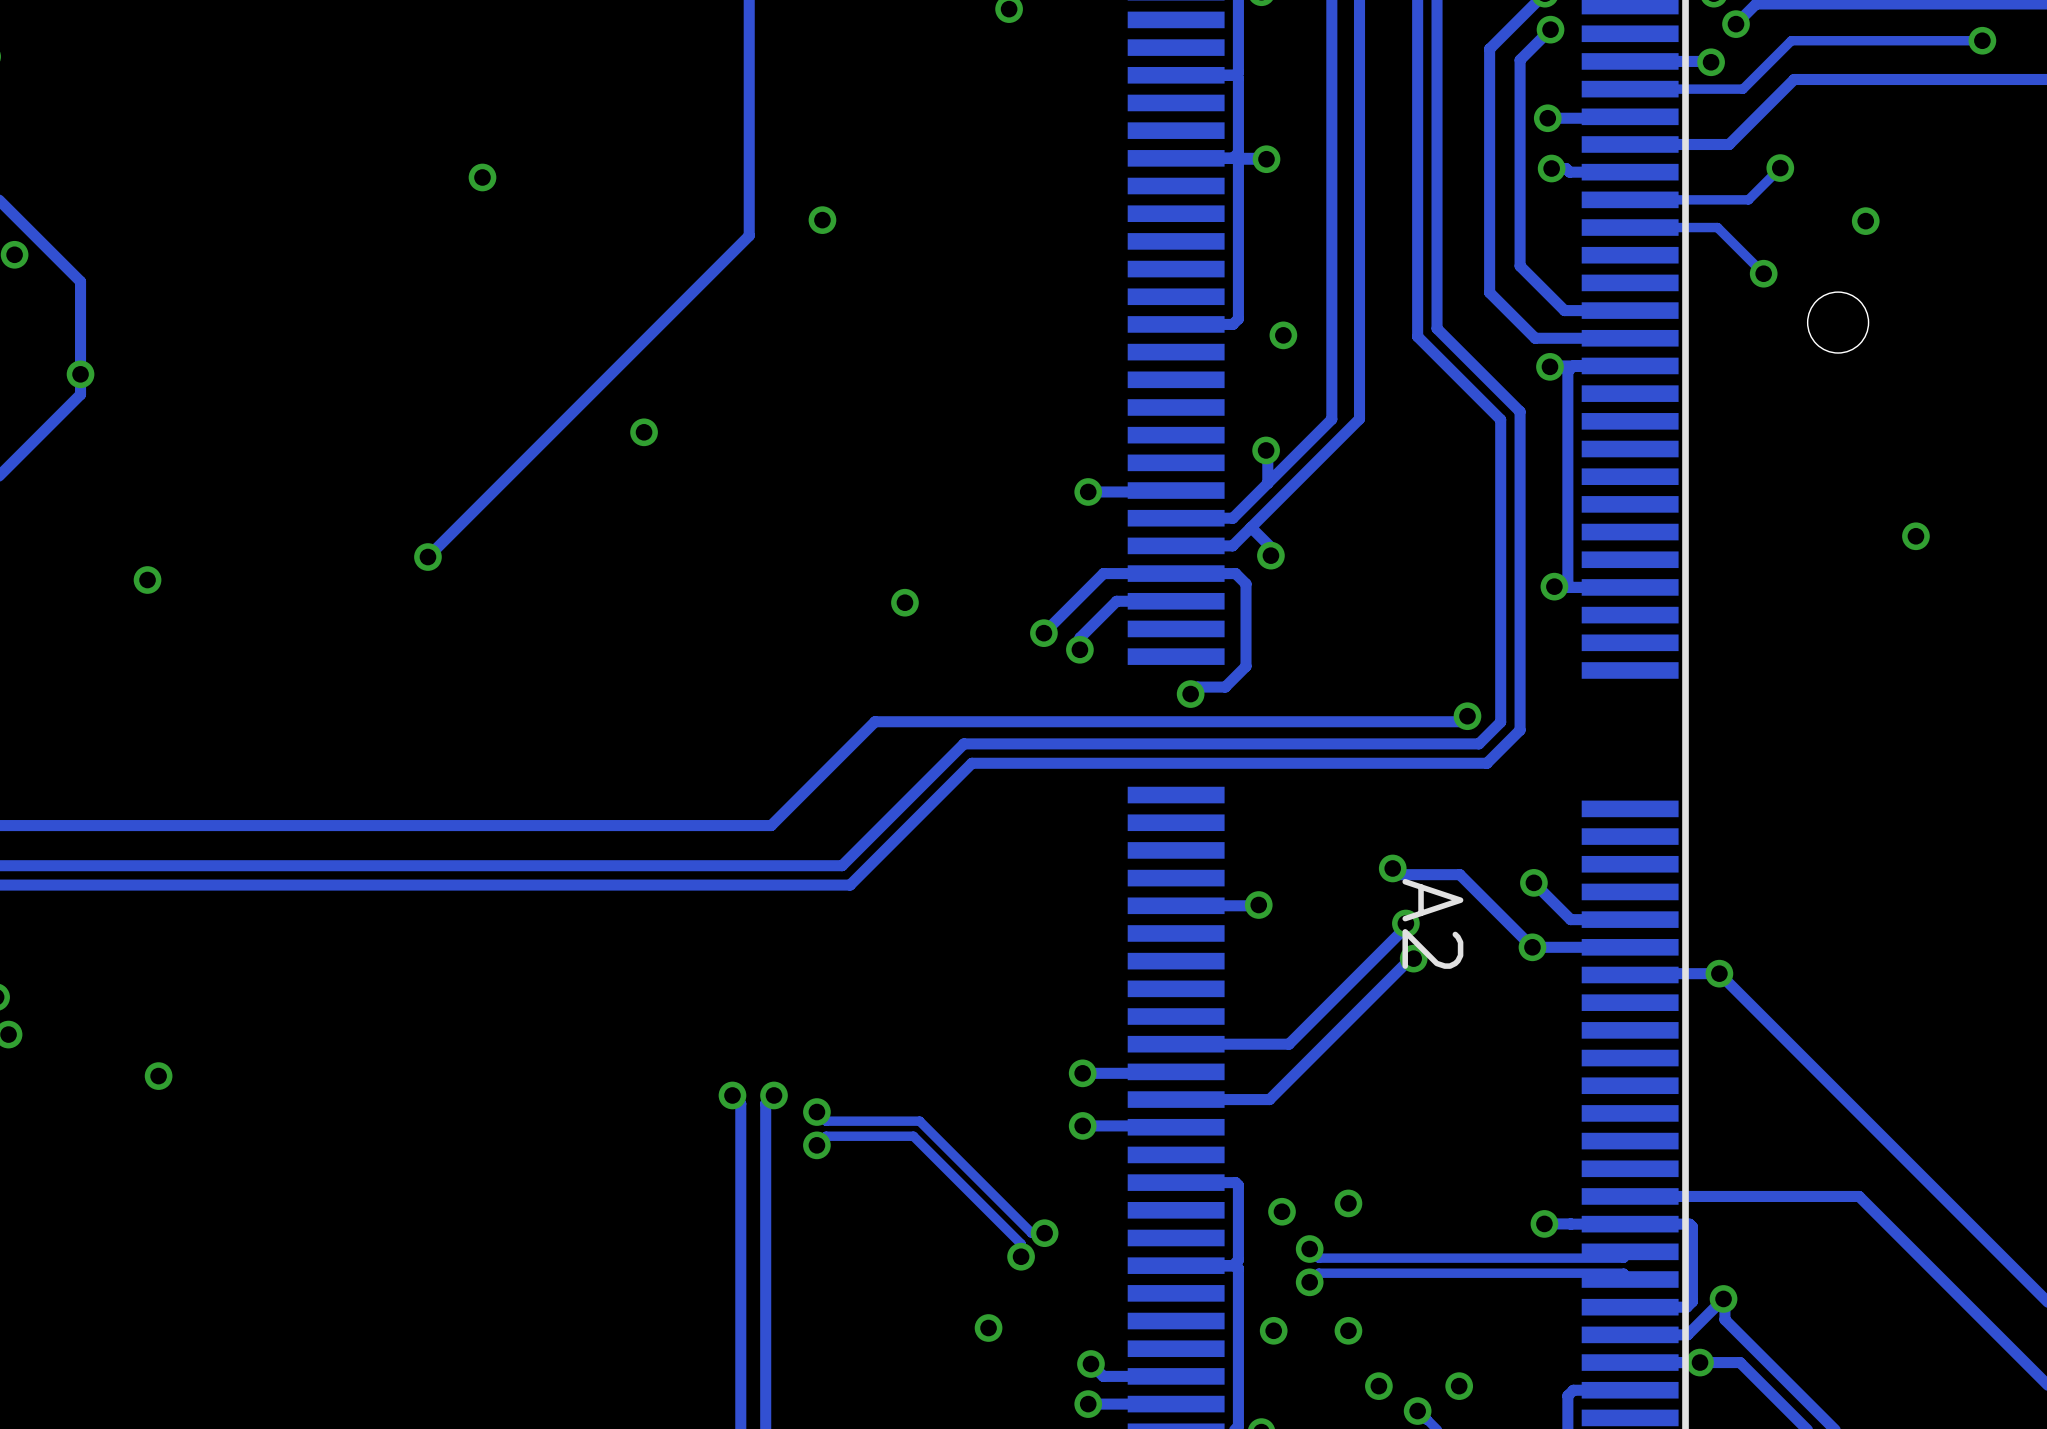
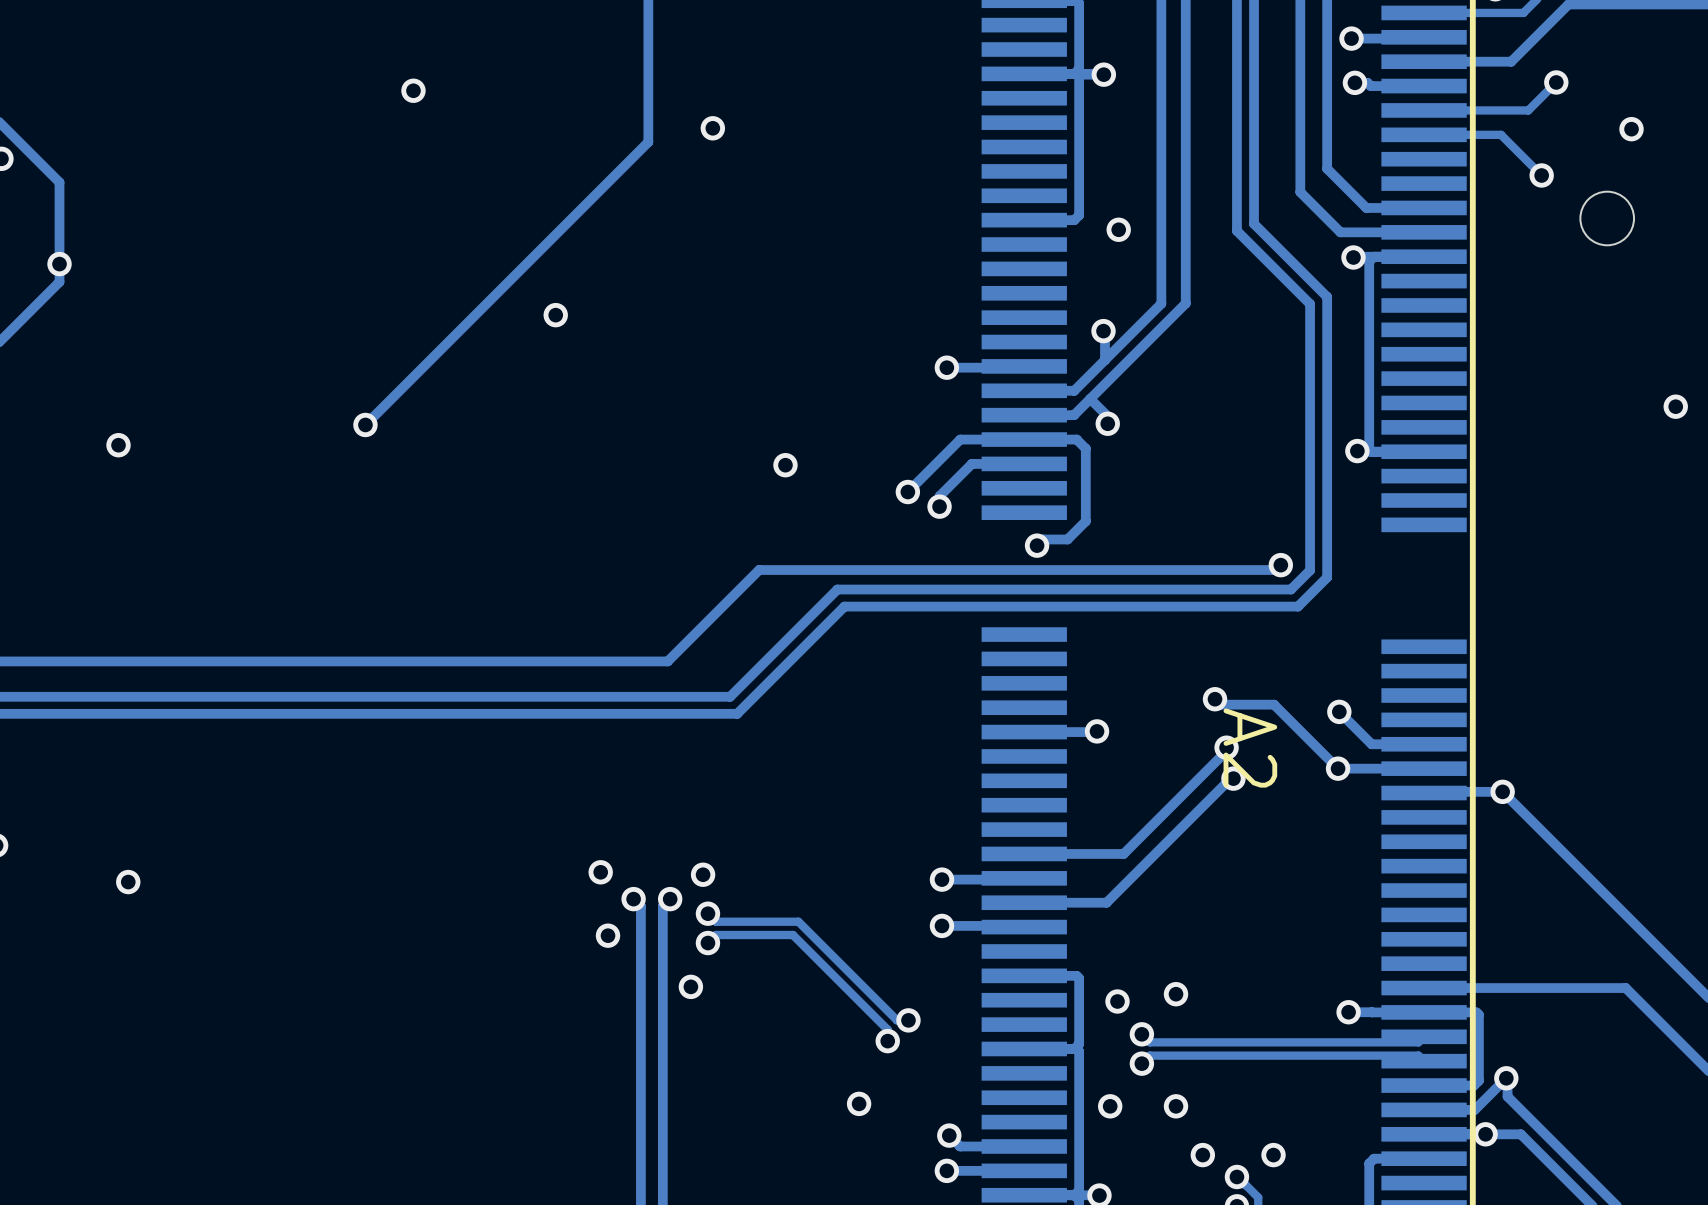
via: none -> (600, 872)
via: none -> (703, 874)
via: none -> (608, 935)
via: none -> (690, 986)

